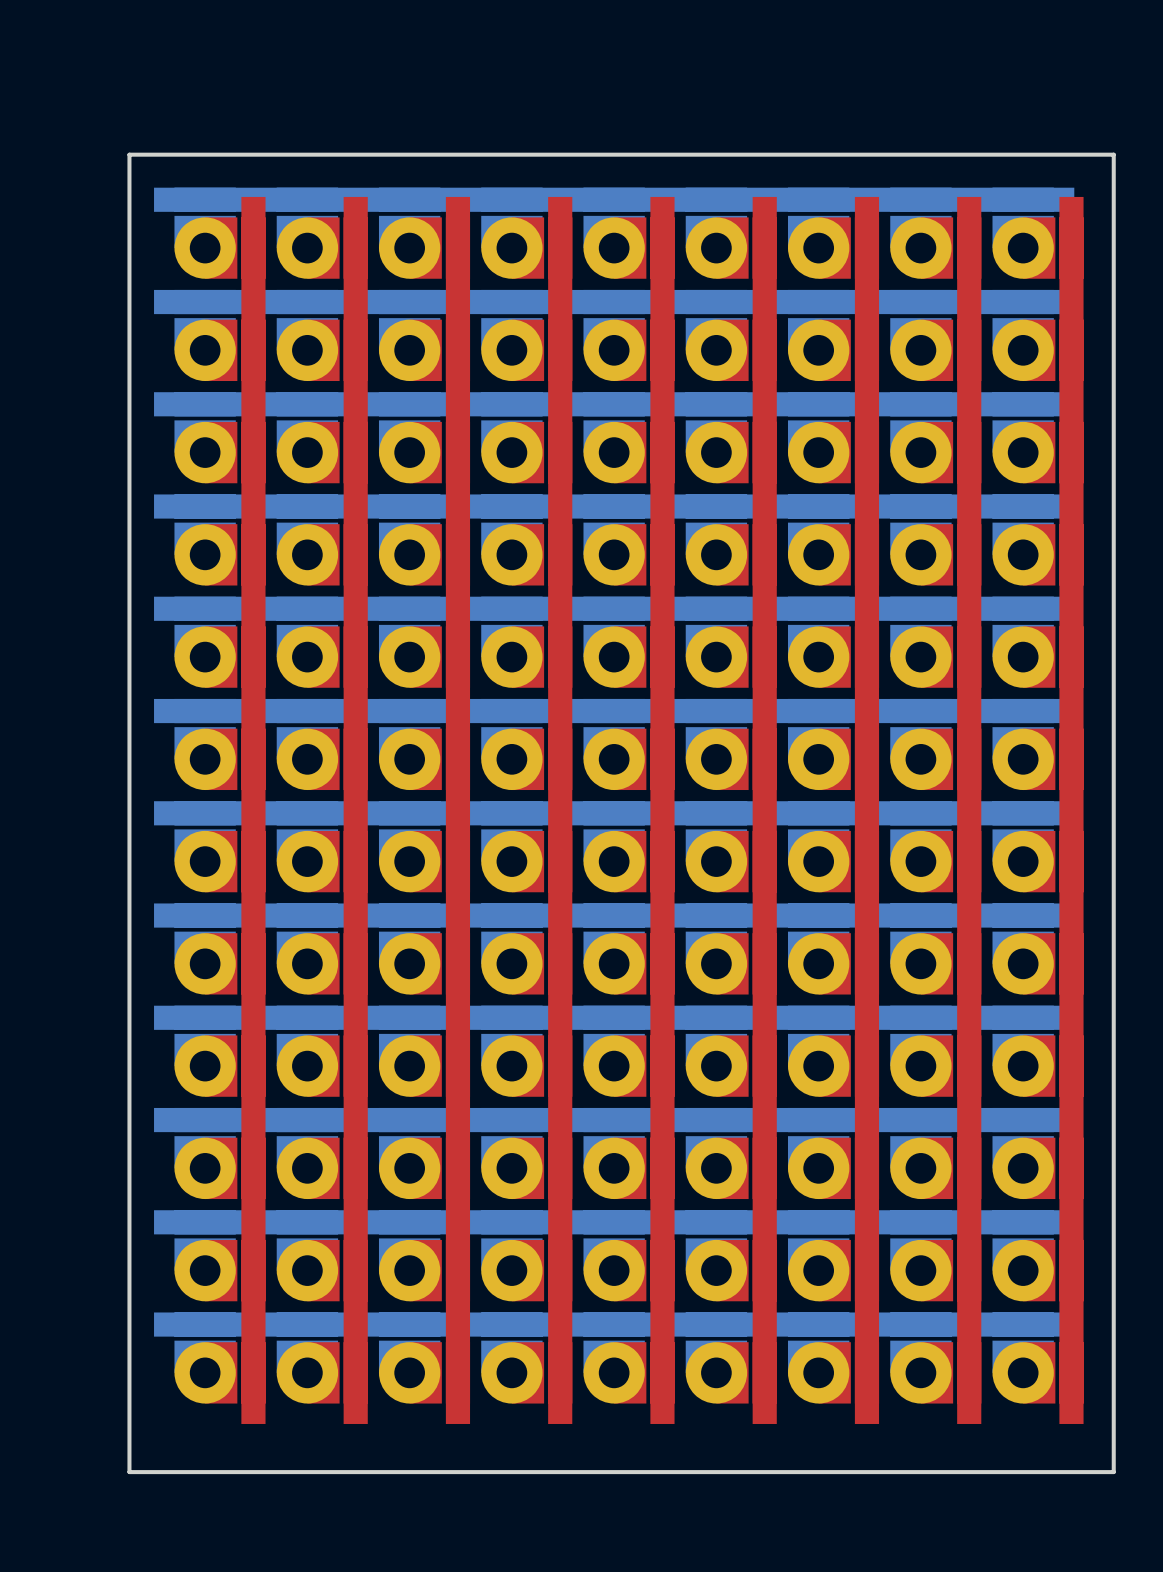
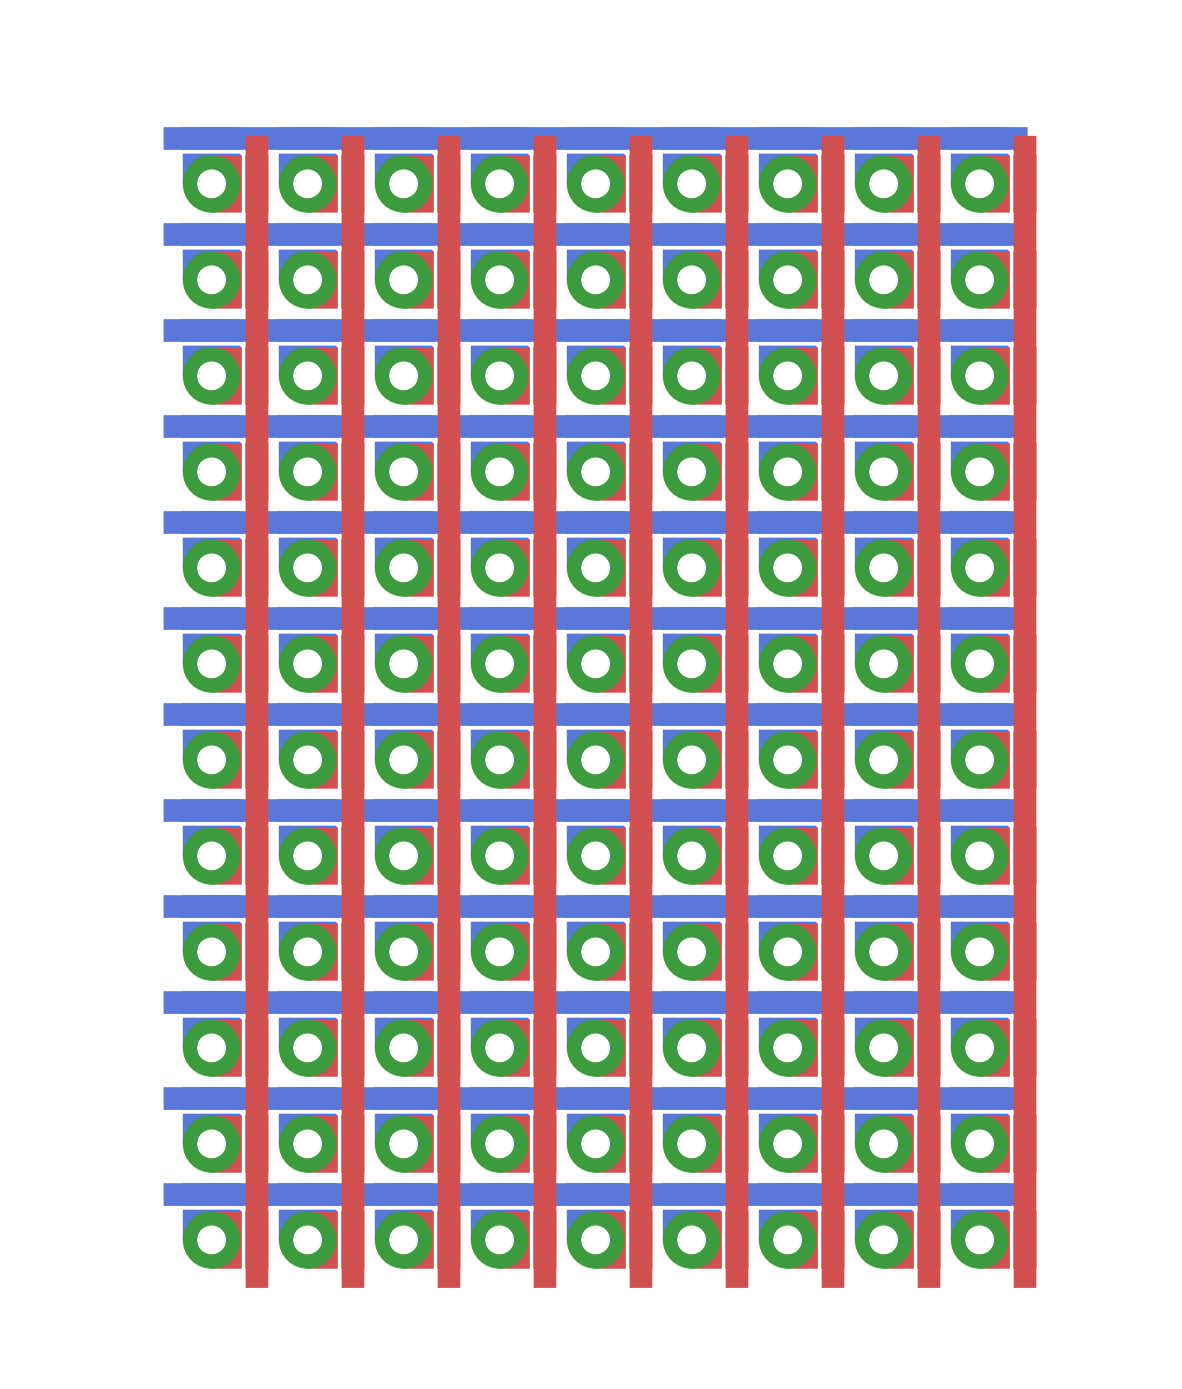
board edge: (129, 154) (1113, 154) (1113, 1472) (129, 1472) (129, 154) -> none

